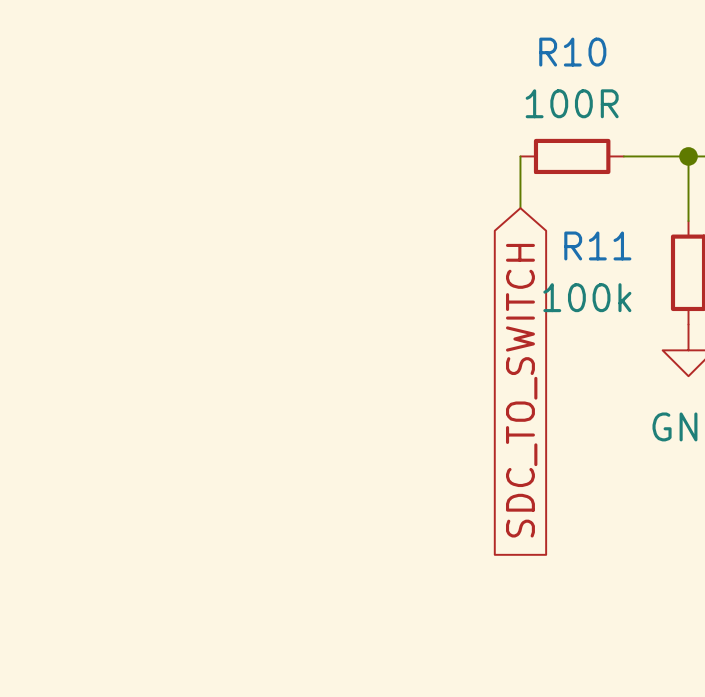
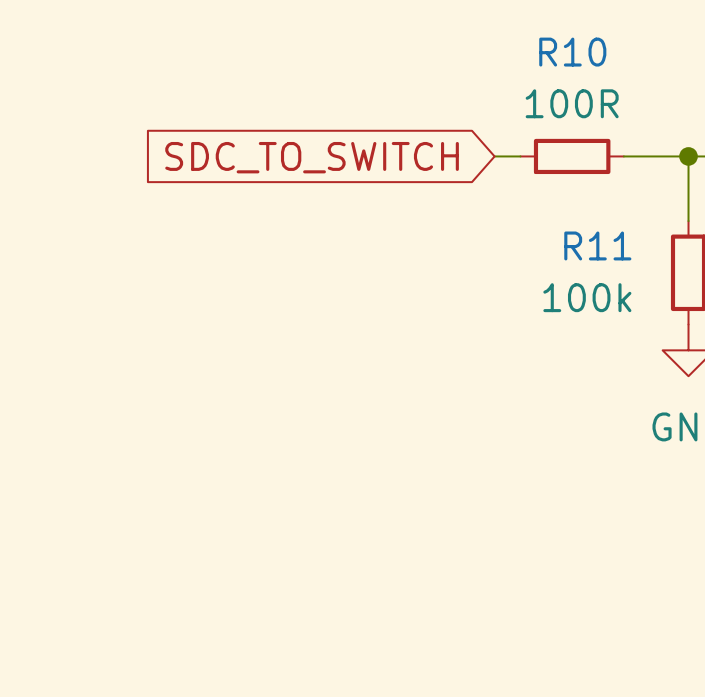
wire: (520, 156) (520, 208) -> (520, 156) (494, 156)
global label rotation: 0° (521, 390) -> 90° clockwise (312, 157)

